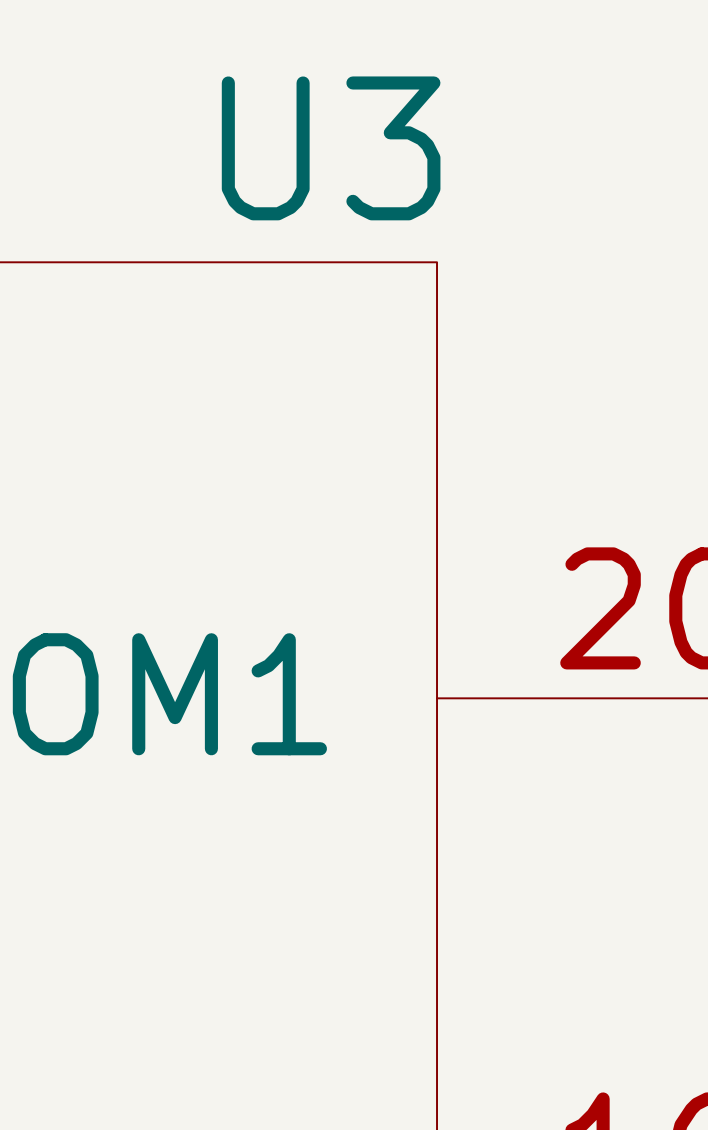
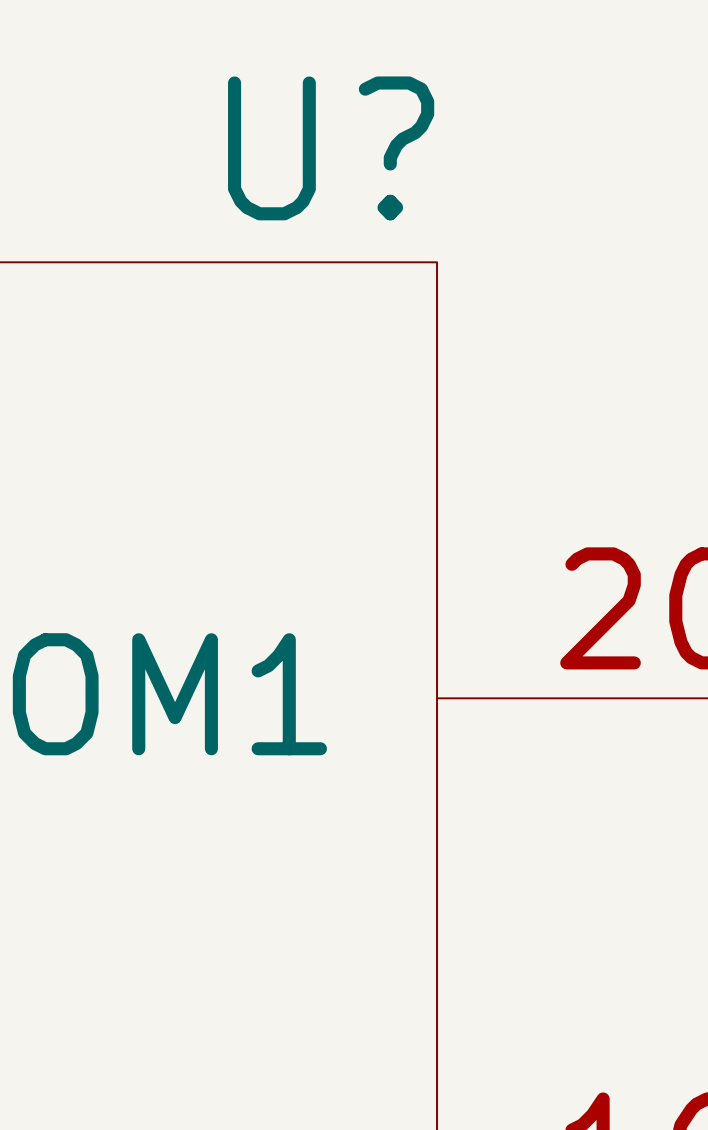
U3 name: U3 (331, 148) -> U? (331, 148)

